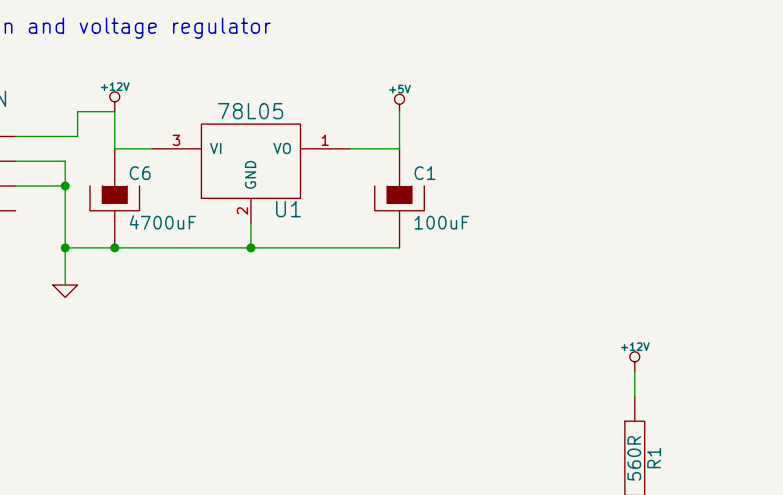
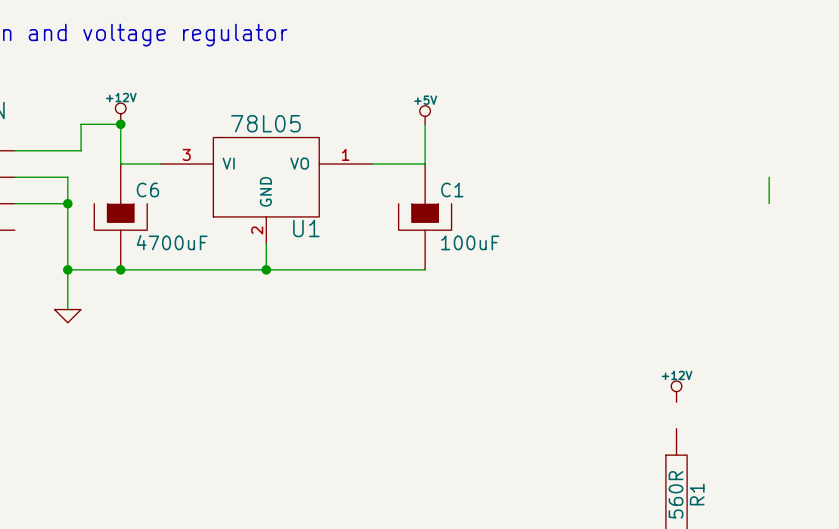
junction: none -> (120, 124)
wire: (634, 371) (634, 396) -> (769, 177) (769, 203)

